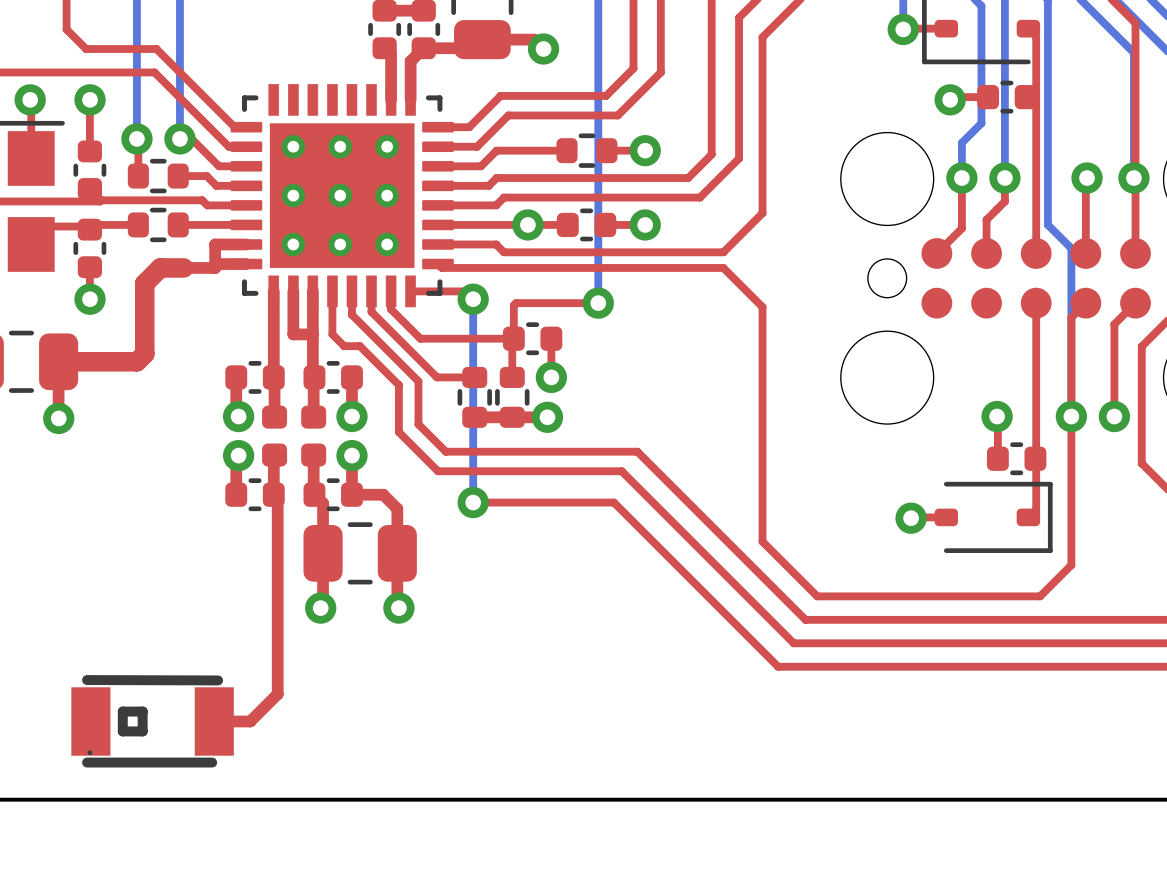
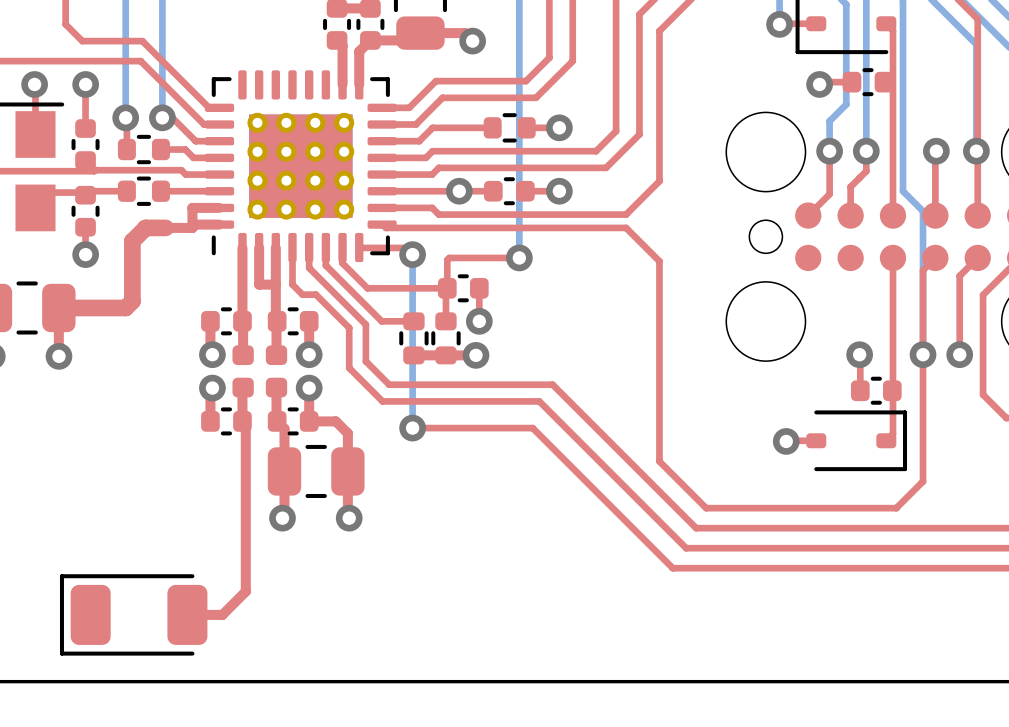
part footprint: [230, 83, 454, 308] -> [204, 70, 397, 263]
part footprint: [71, 675, 234, 768] -> [59, 574, 208, 656]

